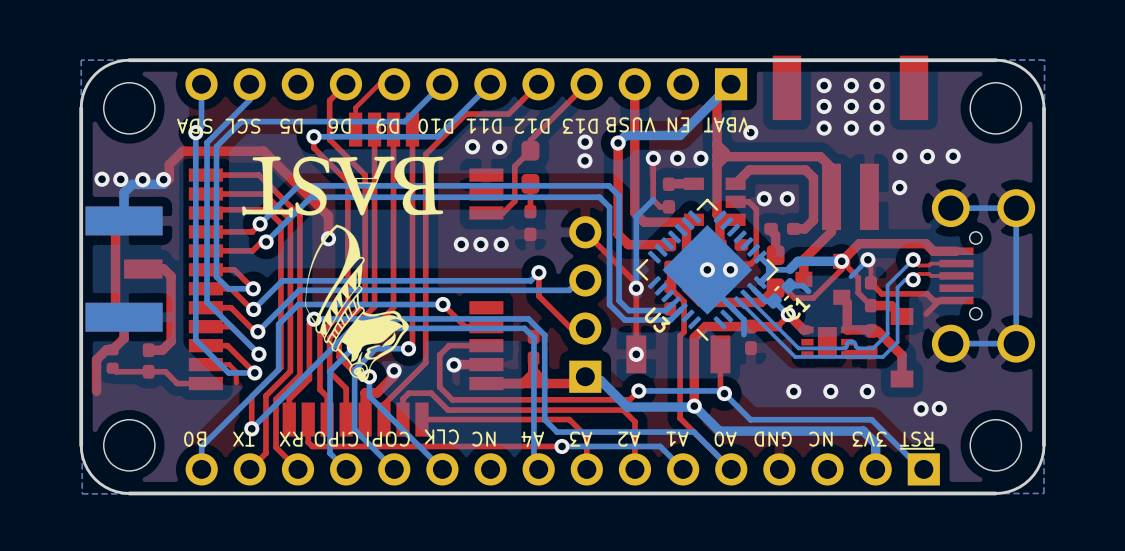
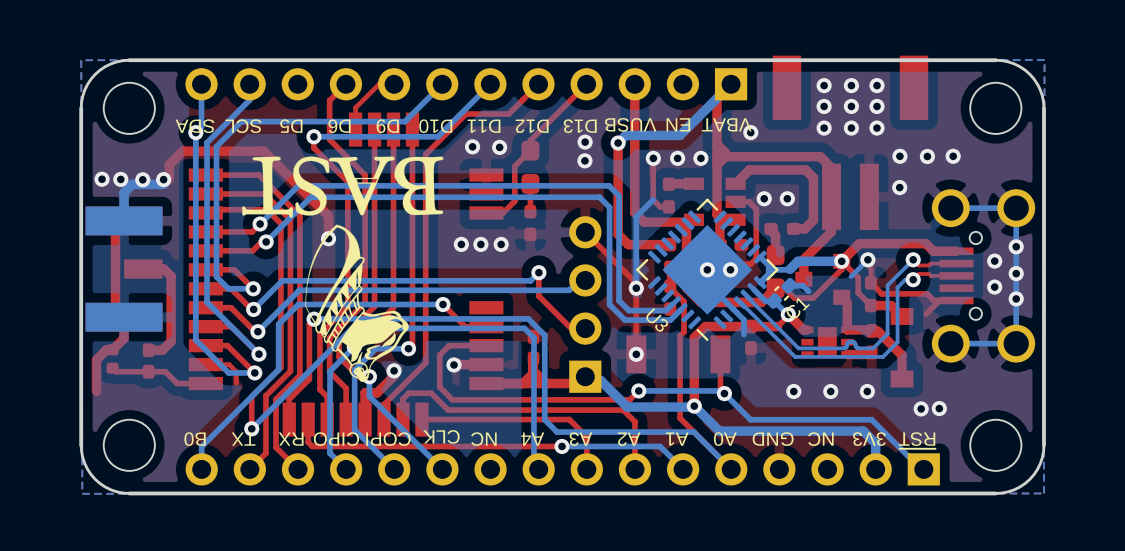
via: none -> (1016, 246)
via: none -> (994, 261)
via: none -> (1016, 273)
via: none -> (994, 287)
via: none -> (1016, 298)

